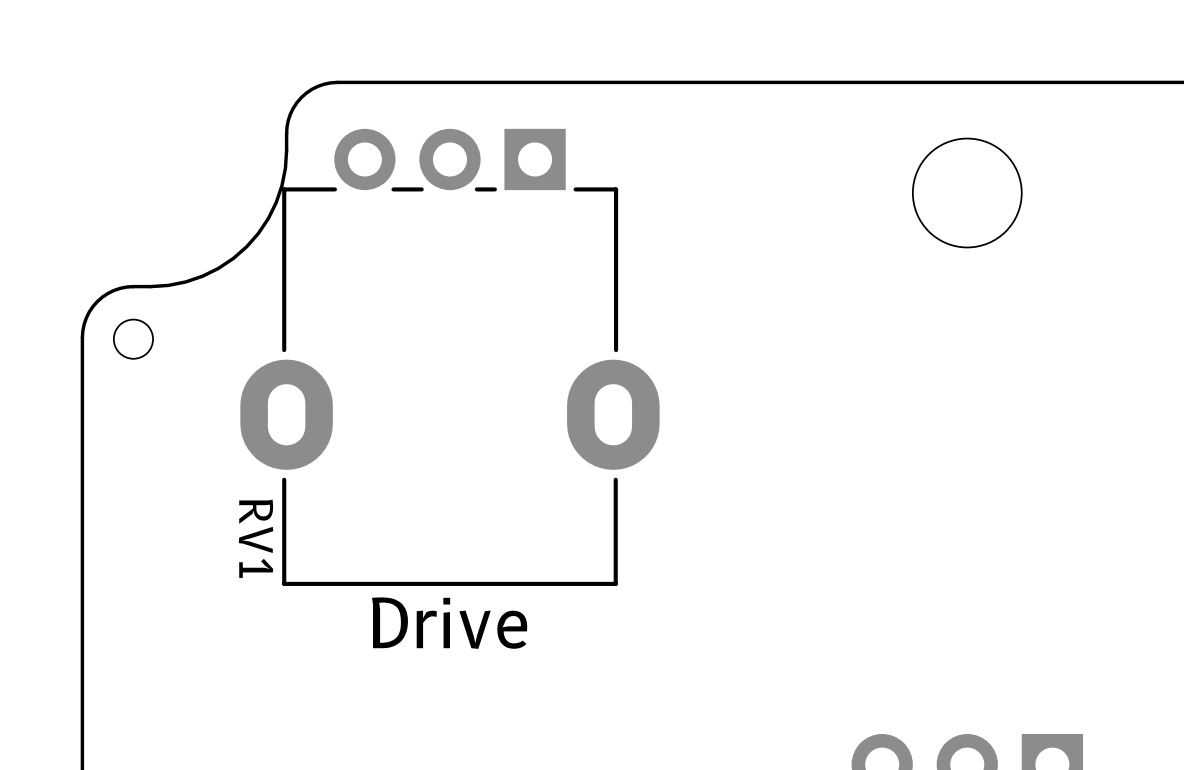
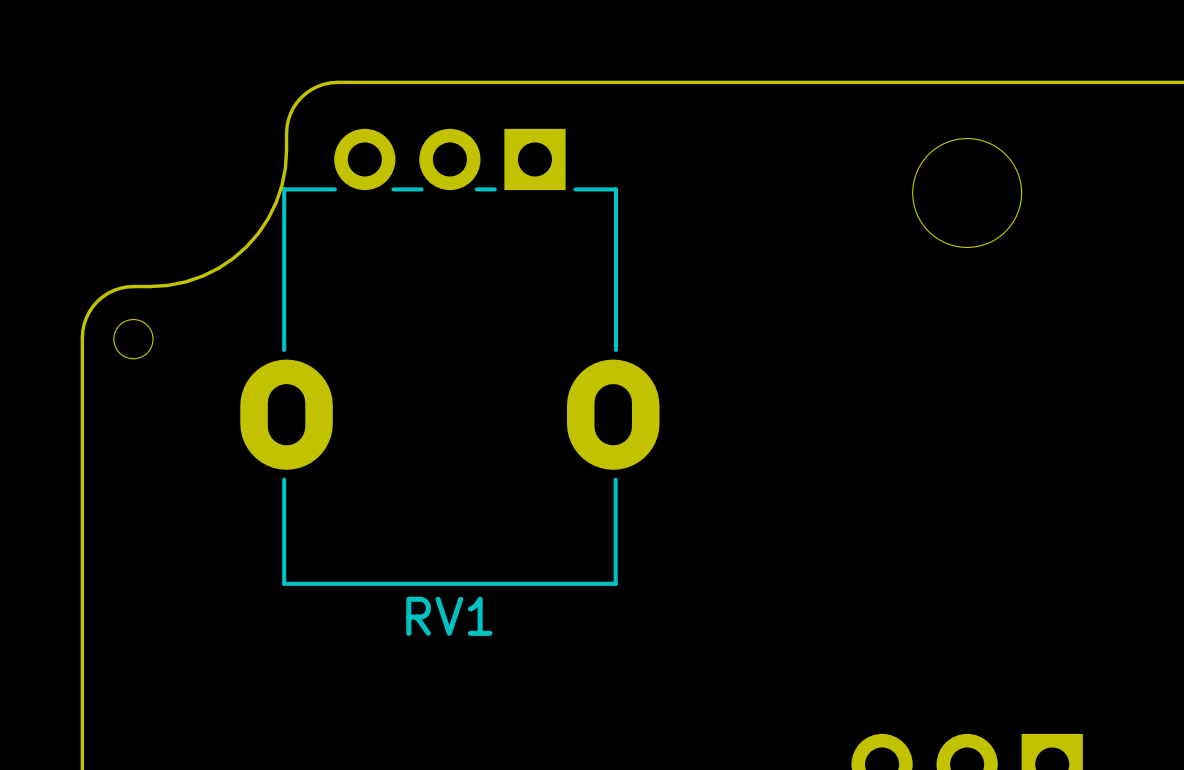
RV1 name rotation: 0° (256, 538) -> 90° counterclockwise (449, 616)
RV1 name position: RV1 (256, 538) -> RV1 (449, 616)
text: Drive (449, 623) -> none

